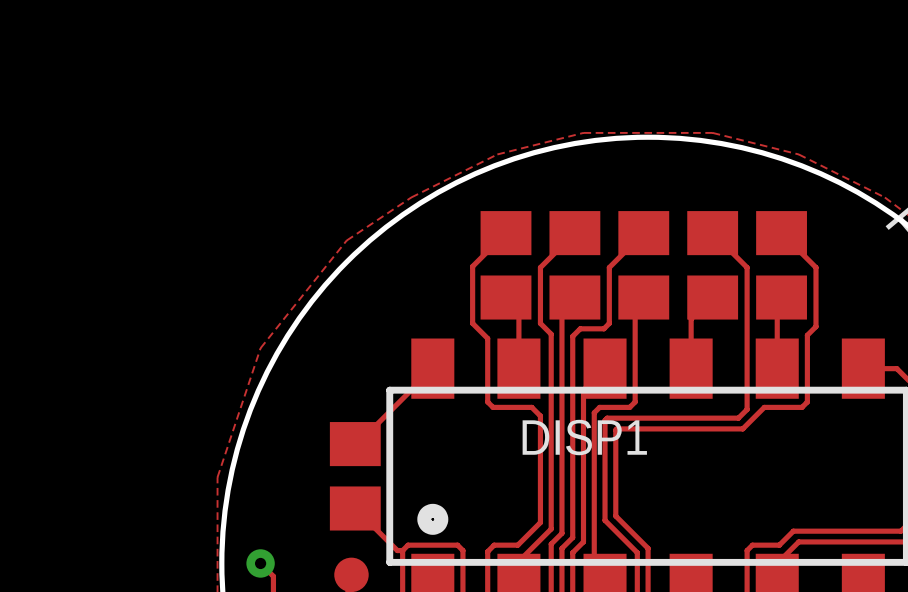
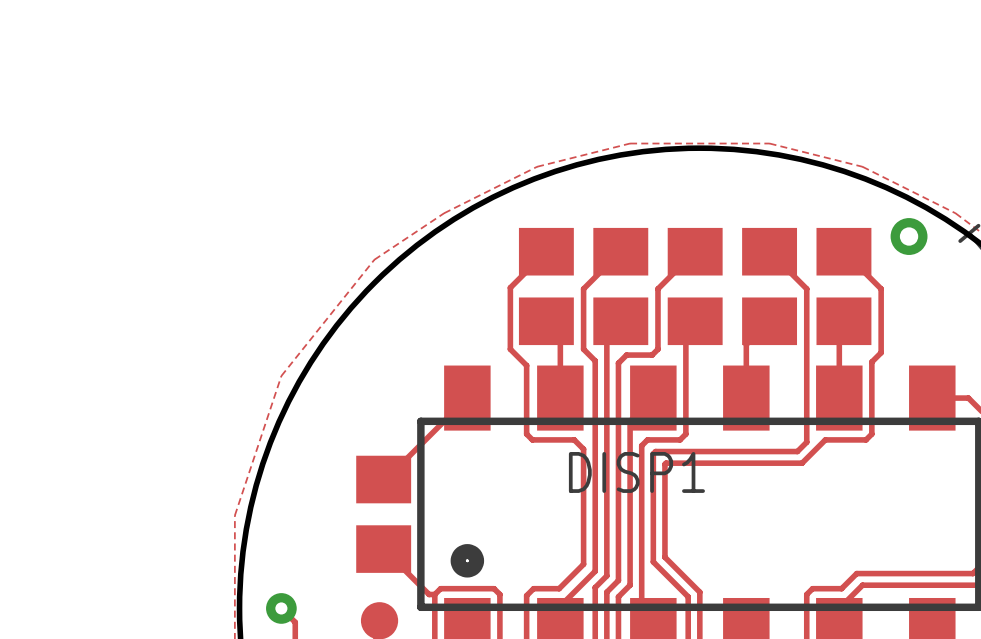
via: none -> (909, 236)

